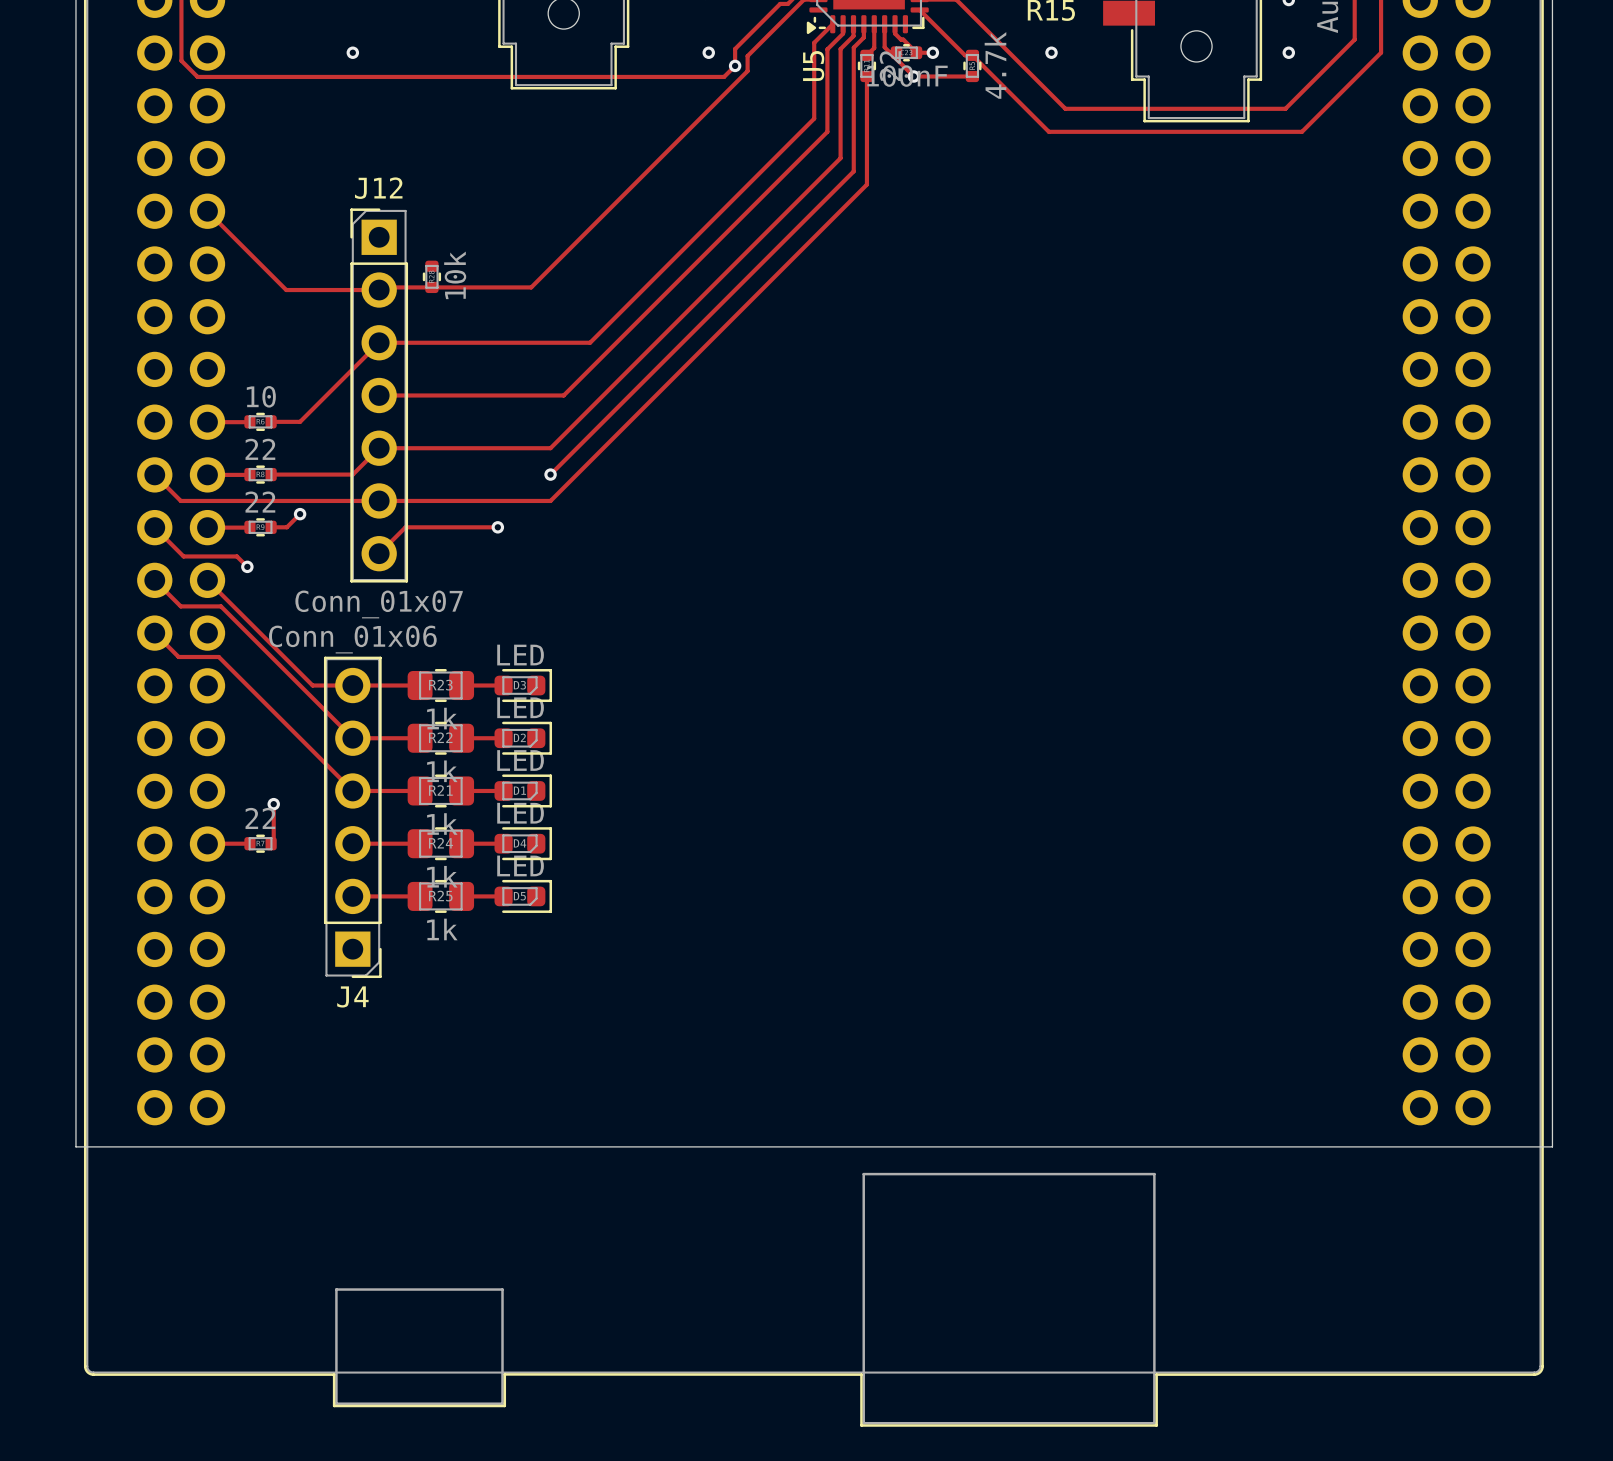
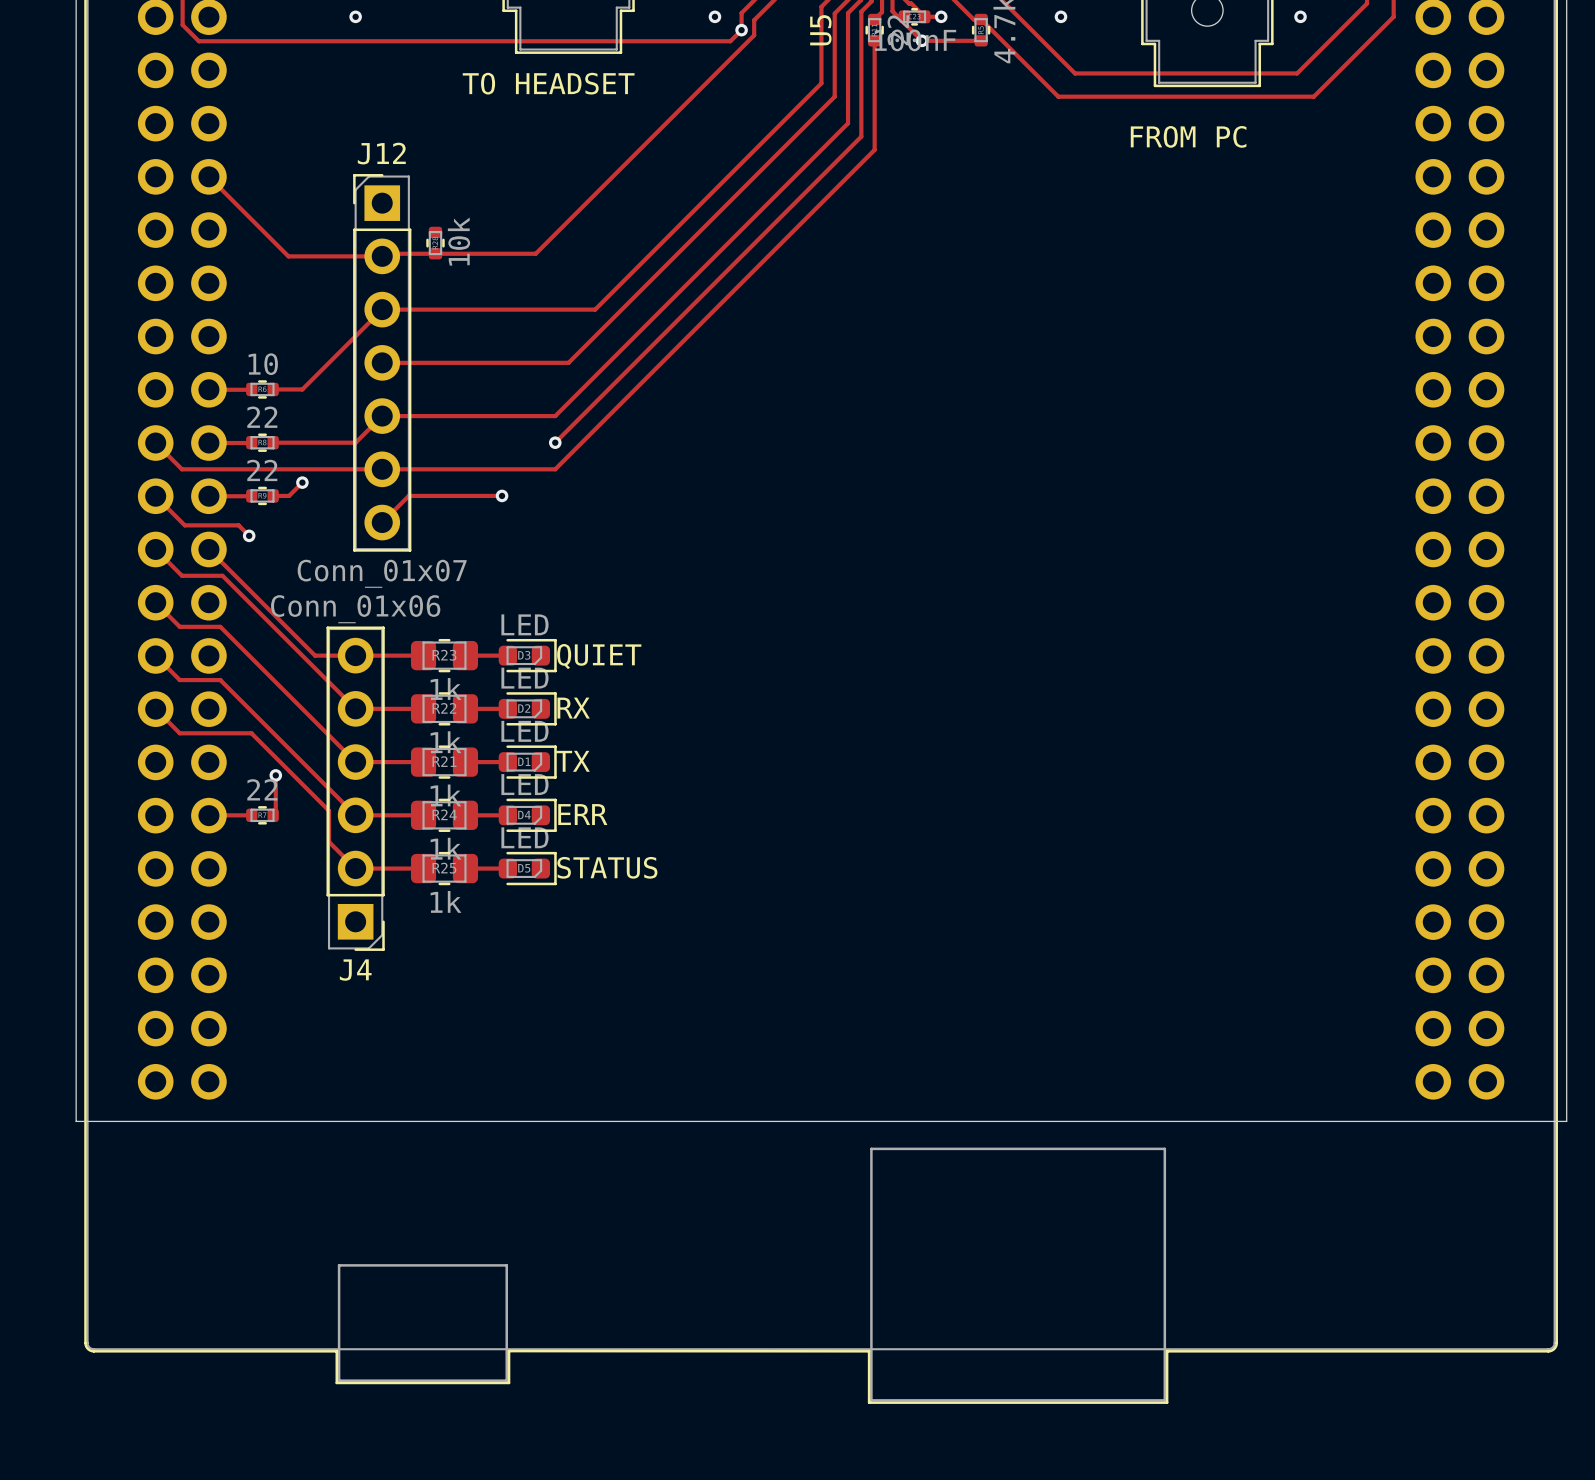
text: none -> TO HEADSET (548, 83)
text: none -> FROM PC (1188, 136)
track: none -> (155, 655) (179, 680) (220, 680) (355, 815)
text: none -> QUIET (599, 656)
text: none -> RX (573, 708)
track: none -> (155, 709) (179, 733) (251, 733) (329, 810) (329, 841) (355, 868)
text: none -> TX (572, 761)
text: none -> ERR (582, 814)
text: none -> STATUS (607, 867)

